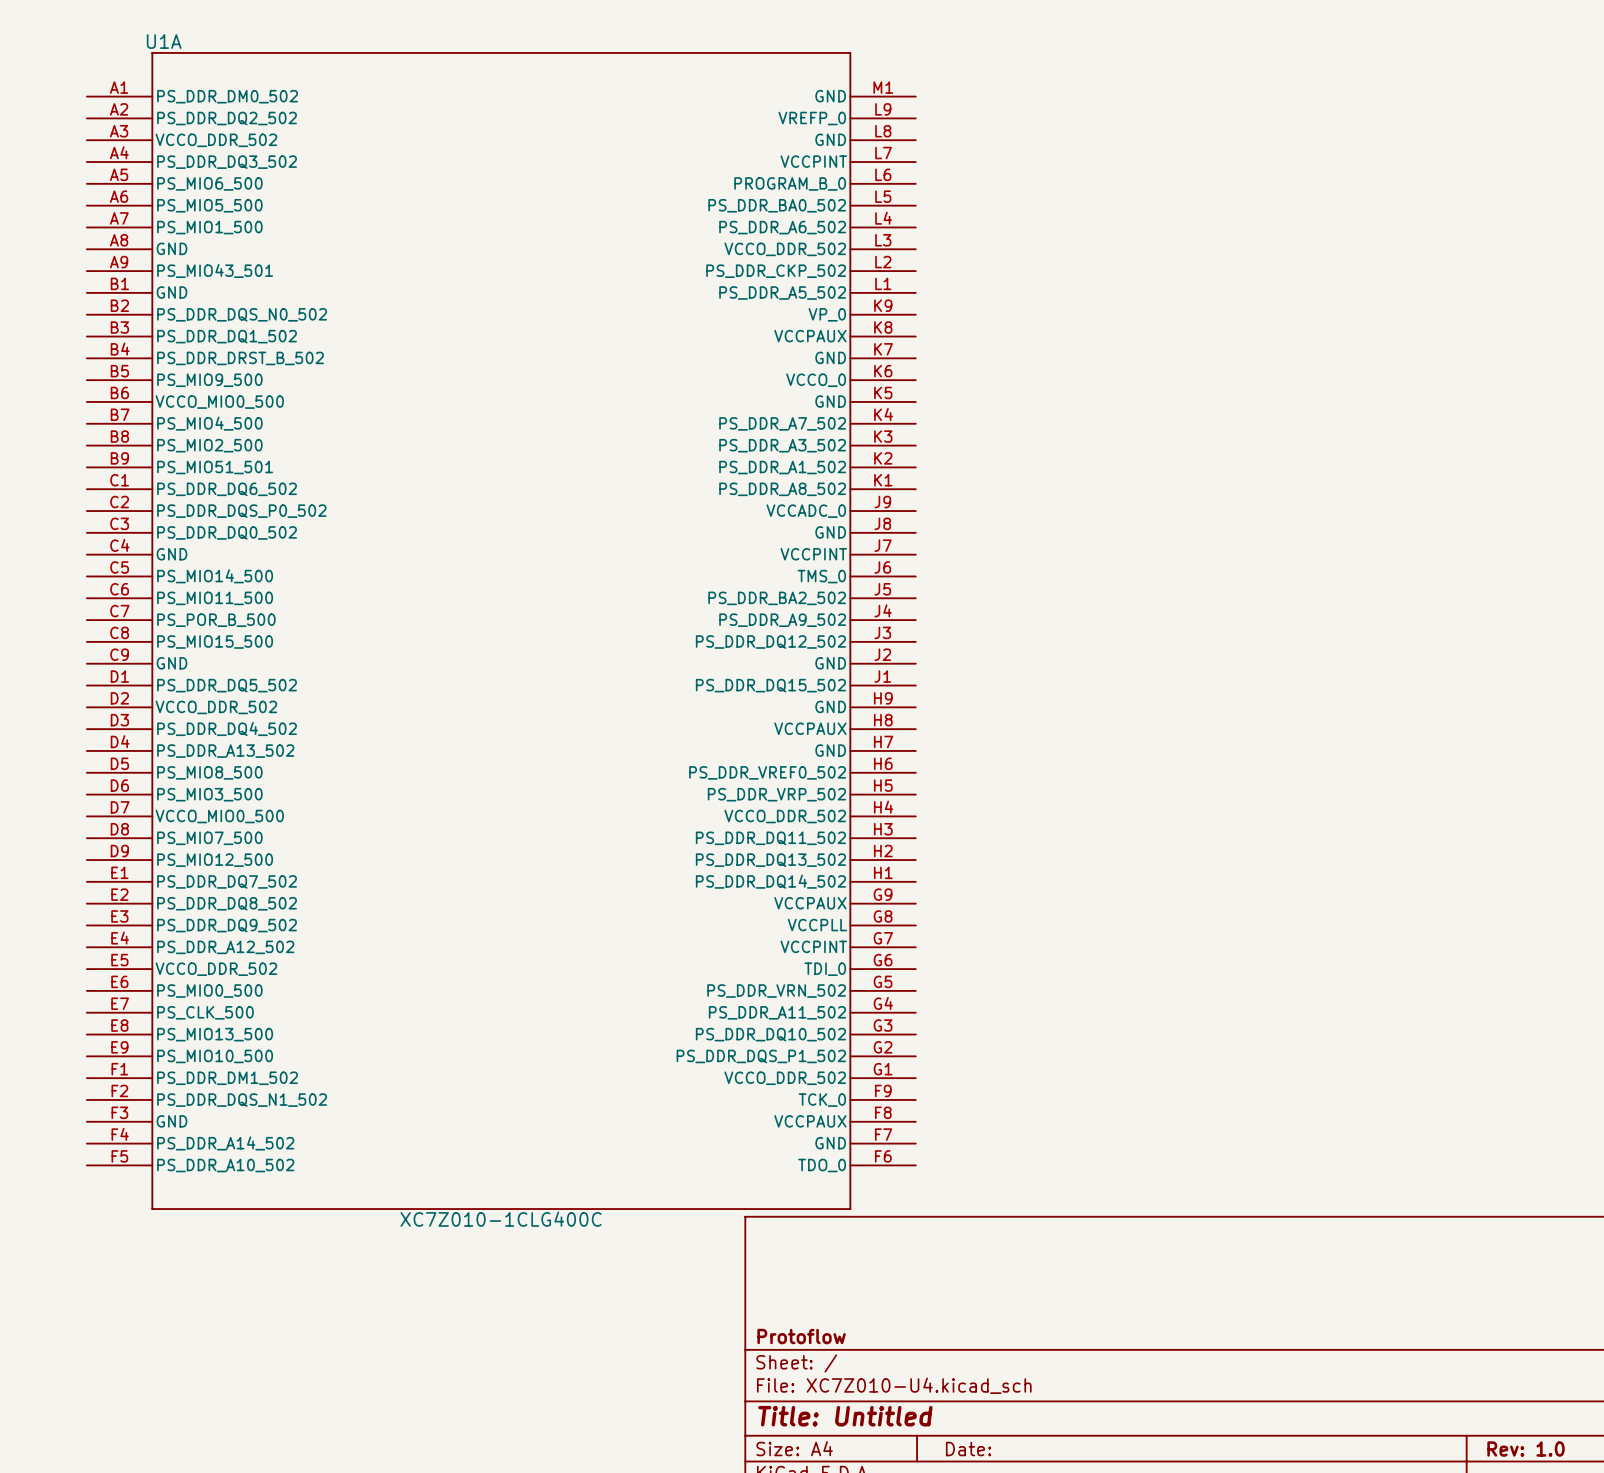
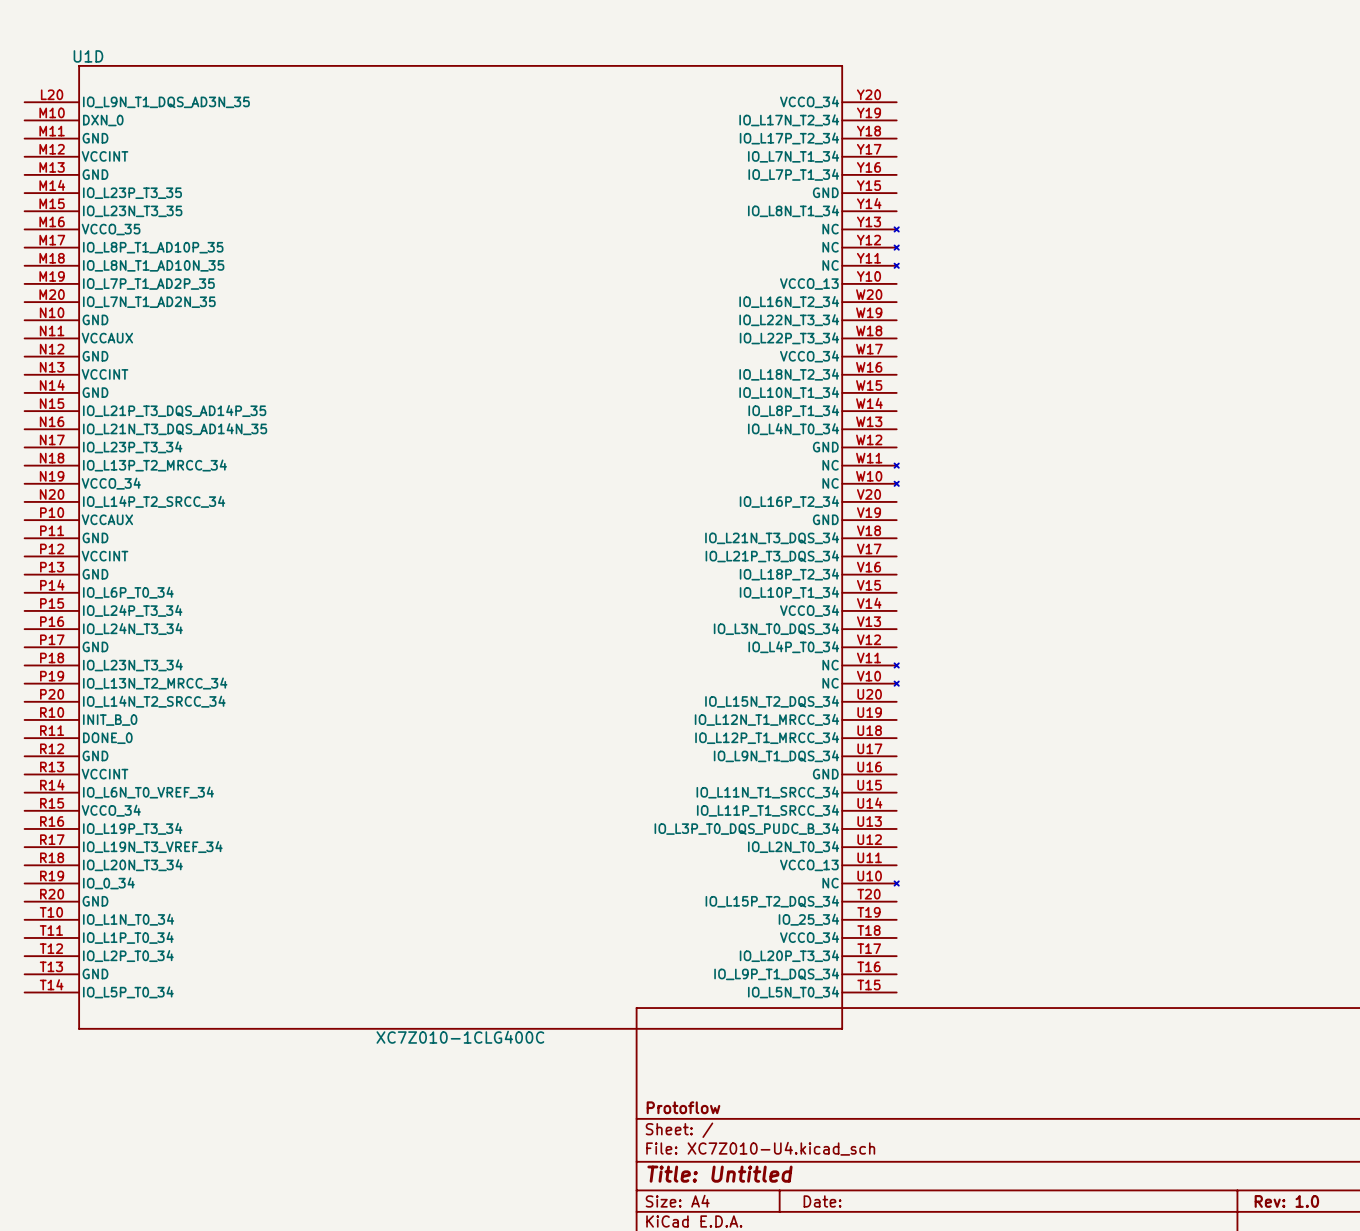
U1A: XC7Z010-1CLG400C (501, 630) -> none
U1D: none -> XC7Z010-1CLG400C (461, 547)

